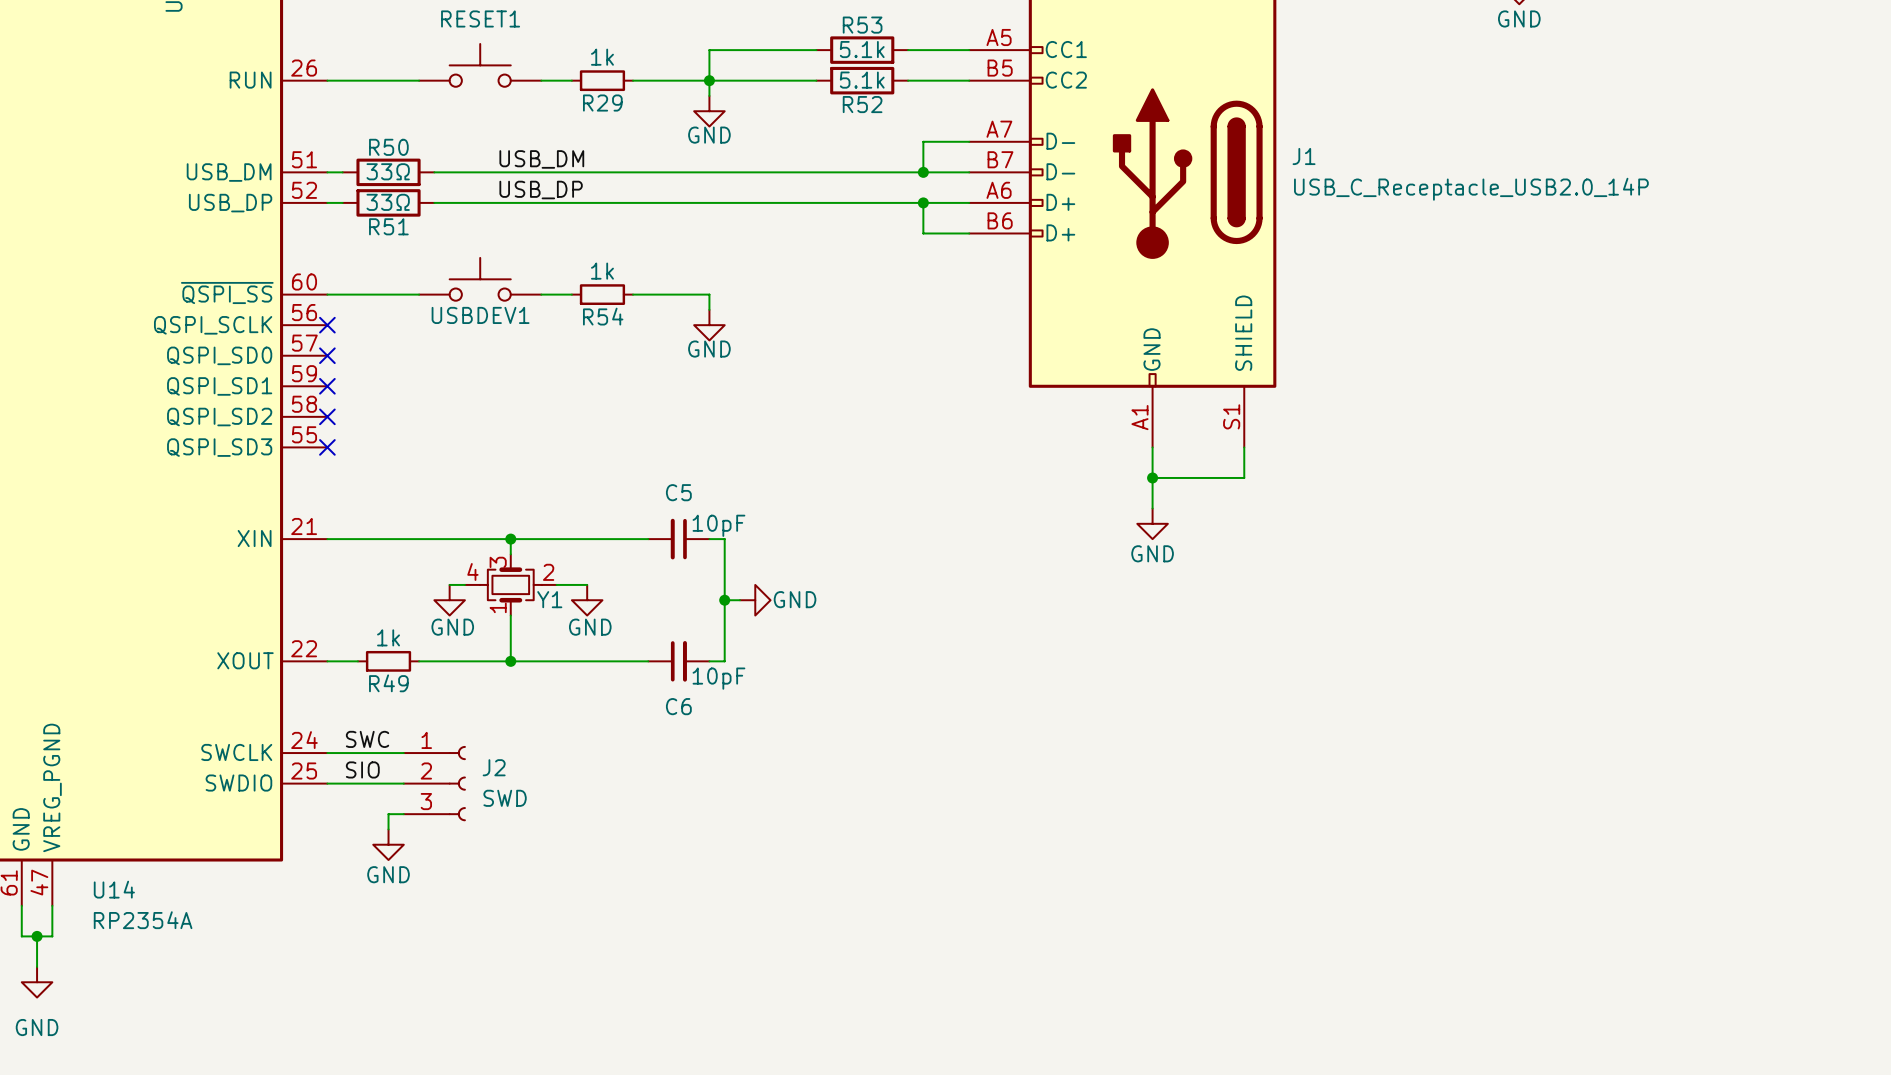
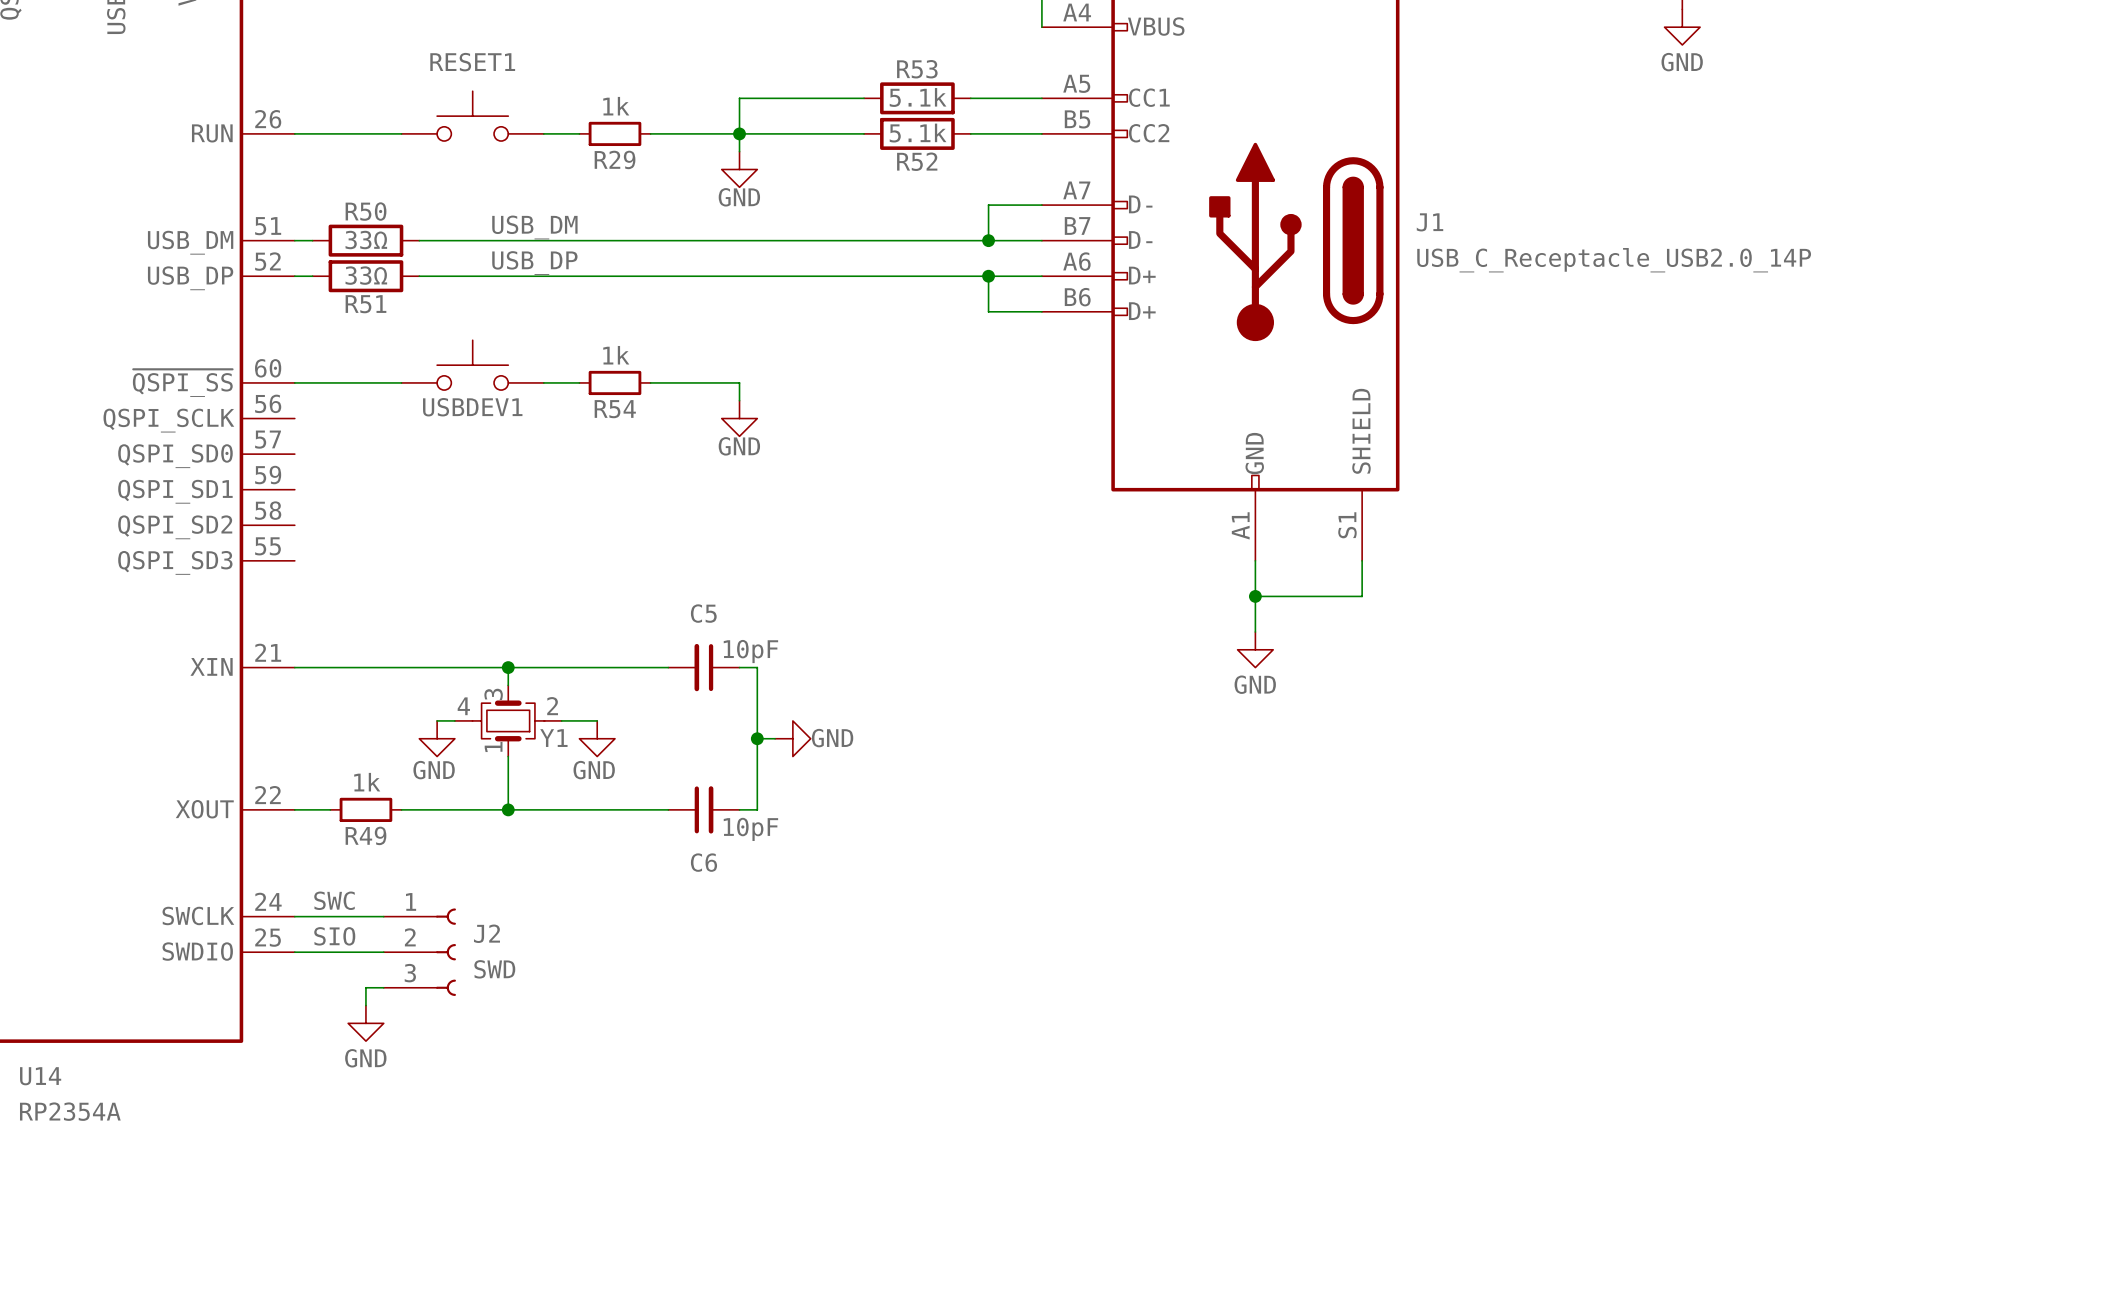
no-connect mark: (327, 325) -> none
no-connect mark: (327, 355) -> none
no-connect mark: (327, 386) -> none
no-connect mark: (327, 416) -> none
no-connect mark: (327, 447) -> none

